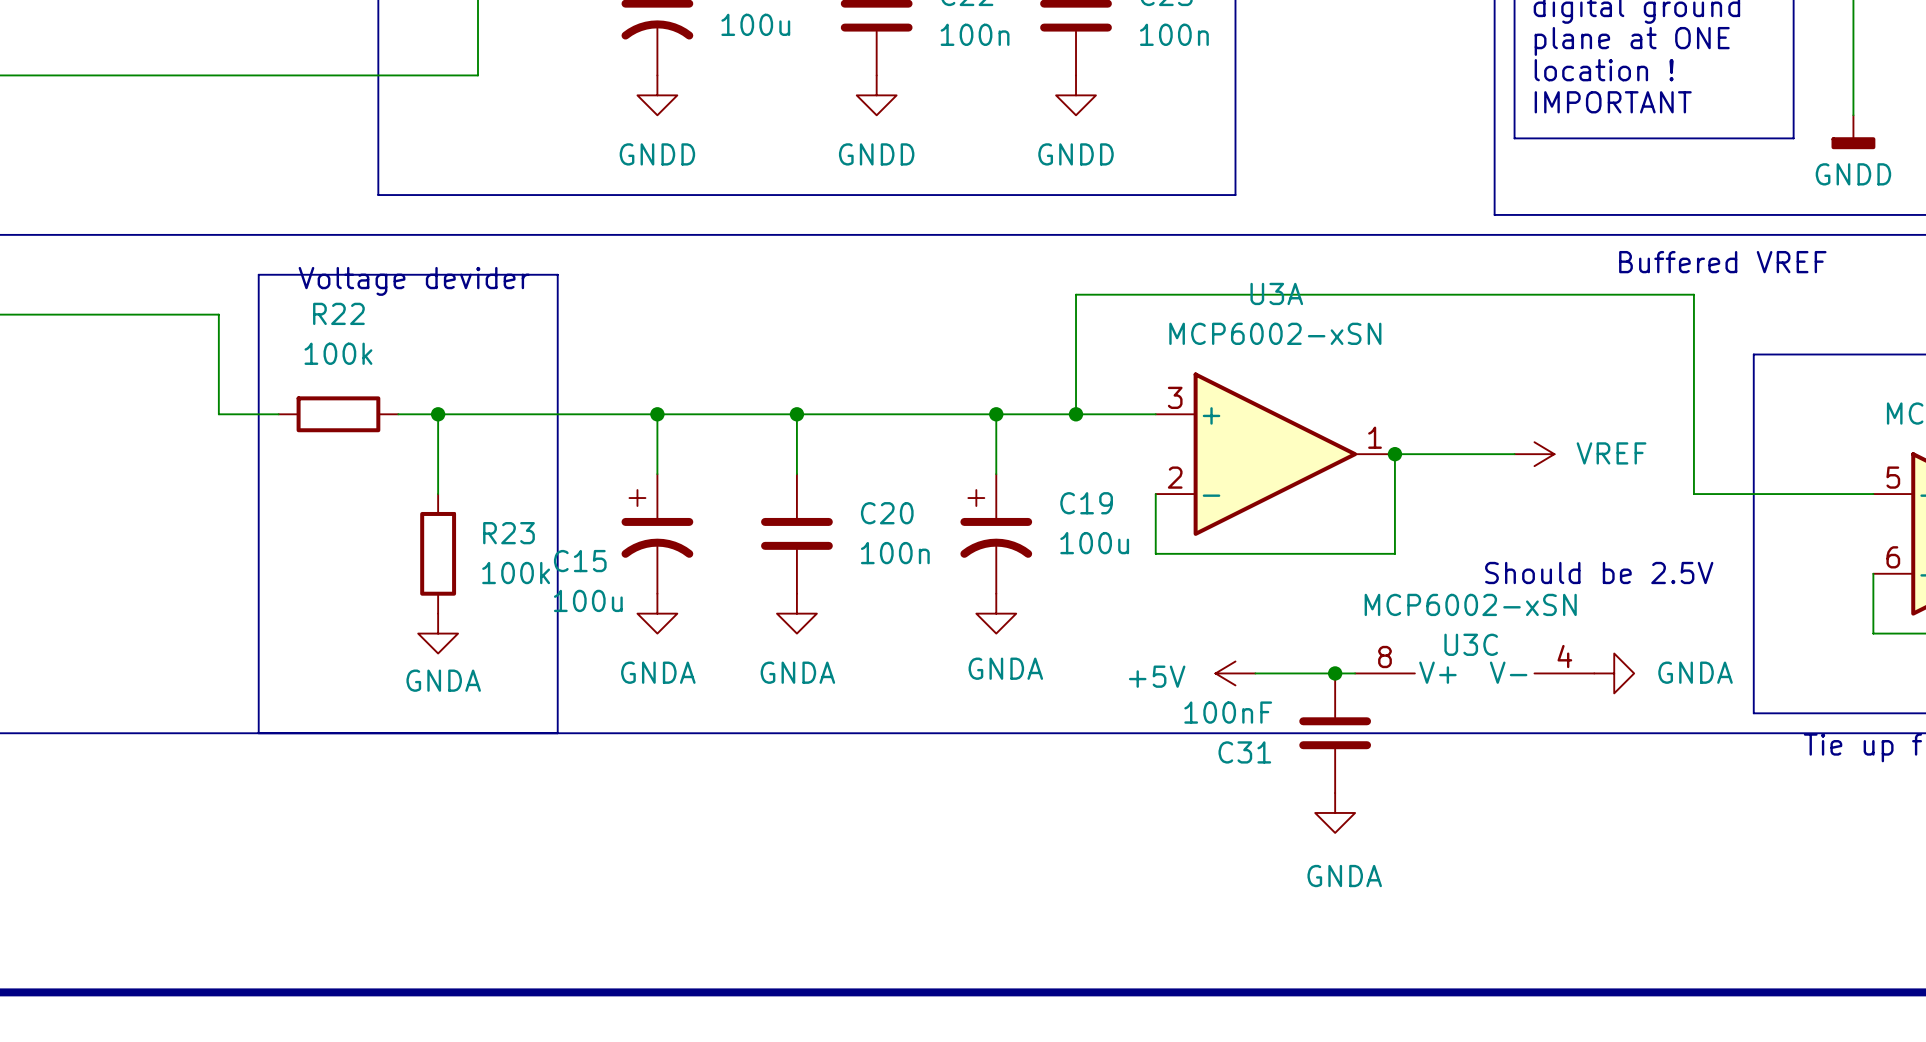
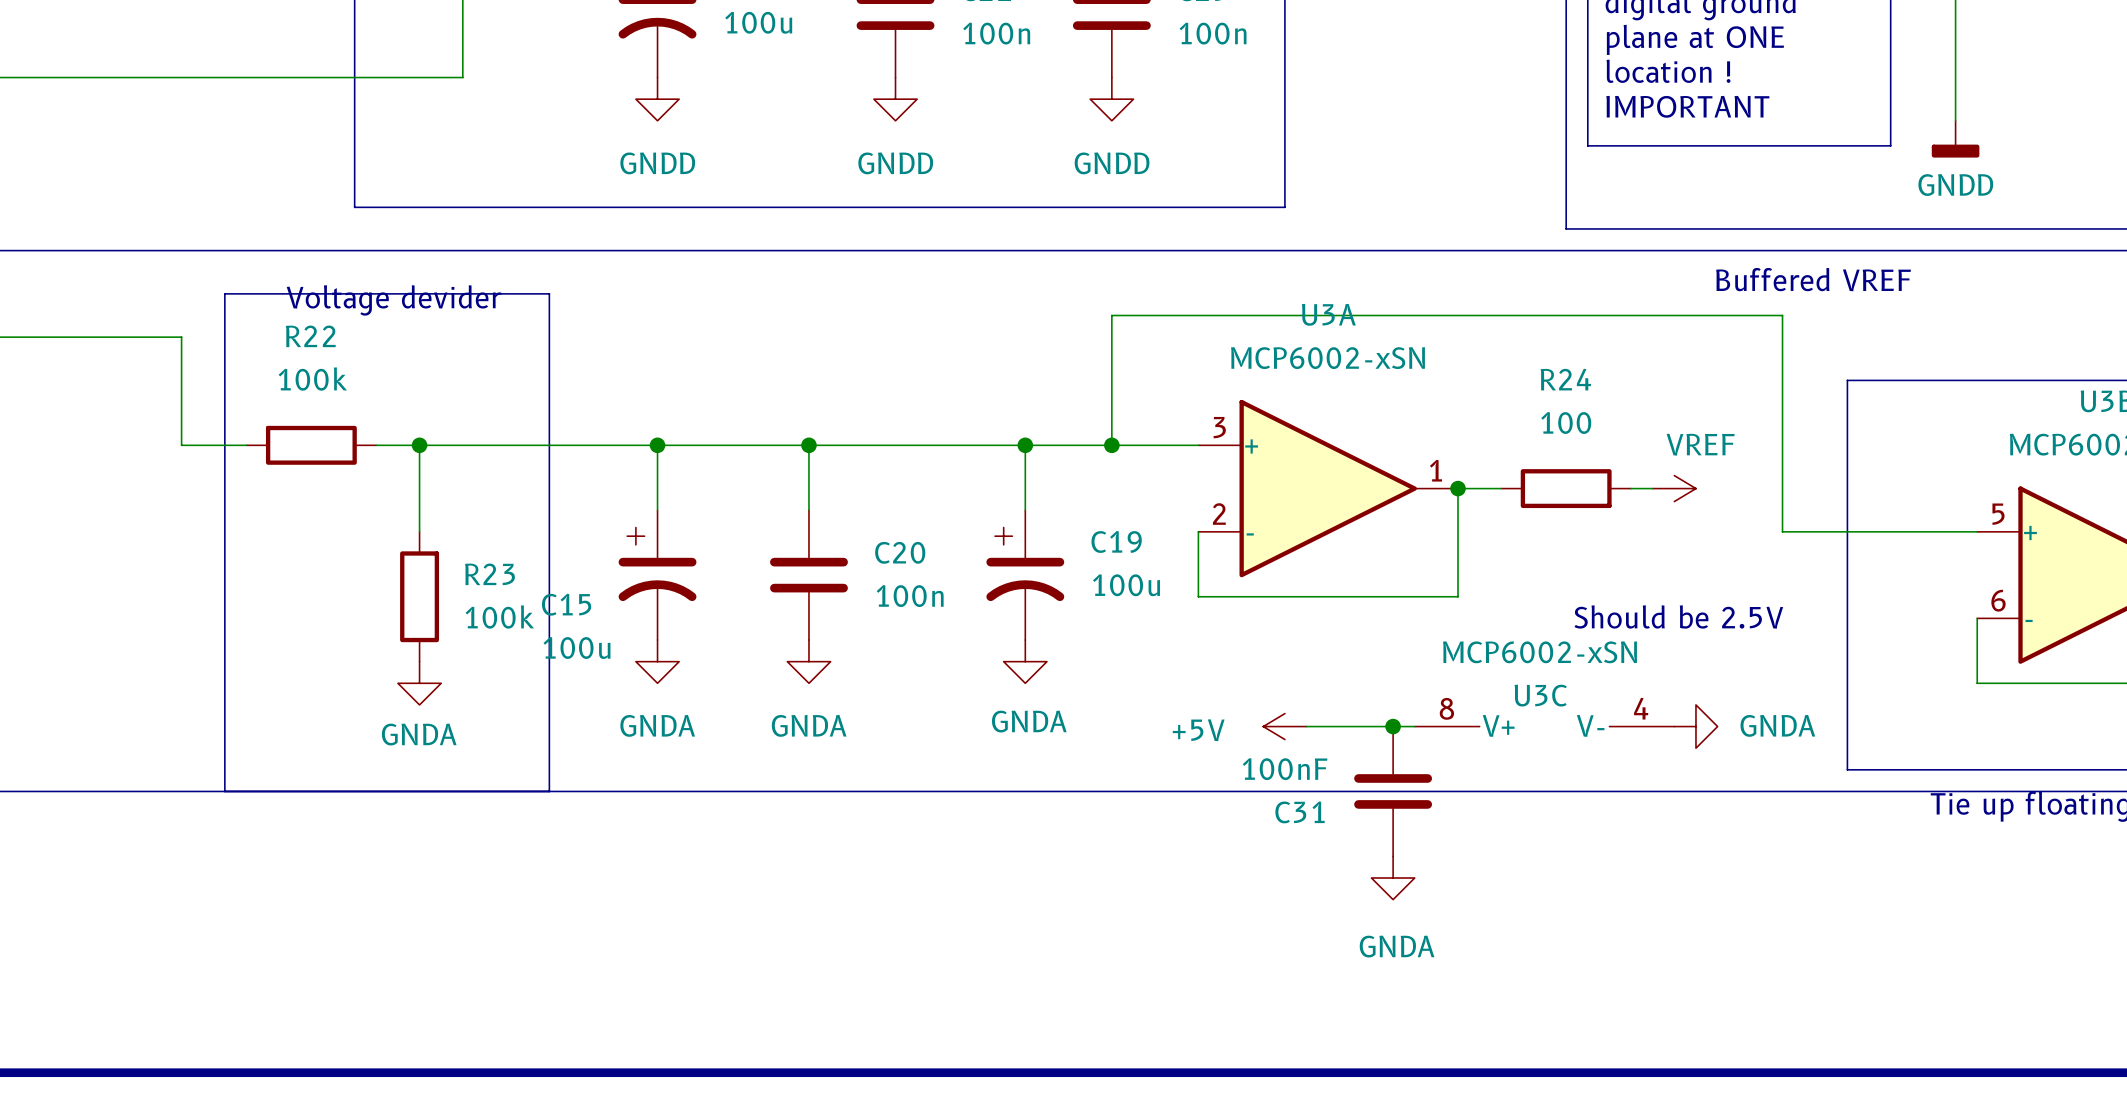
power symbol text position: VREF (1611, 453) -> VREF (1700, 444)
wire: (1434, 454) (1514, 454) -> none
R24: none -> 100 (1566, 488)
power symbol position: VREF (1534, 454) -> VREF (1674, 488)
wire: none -> (1631, 488) (1652, 488)

